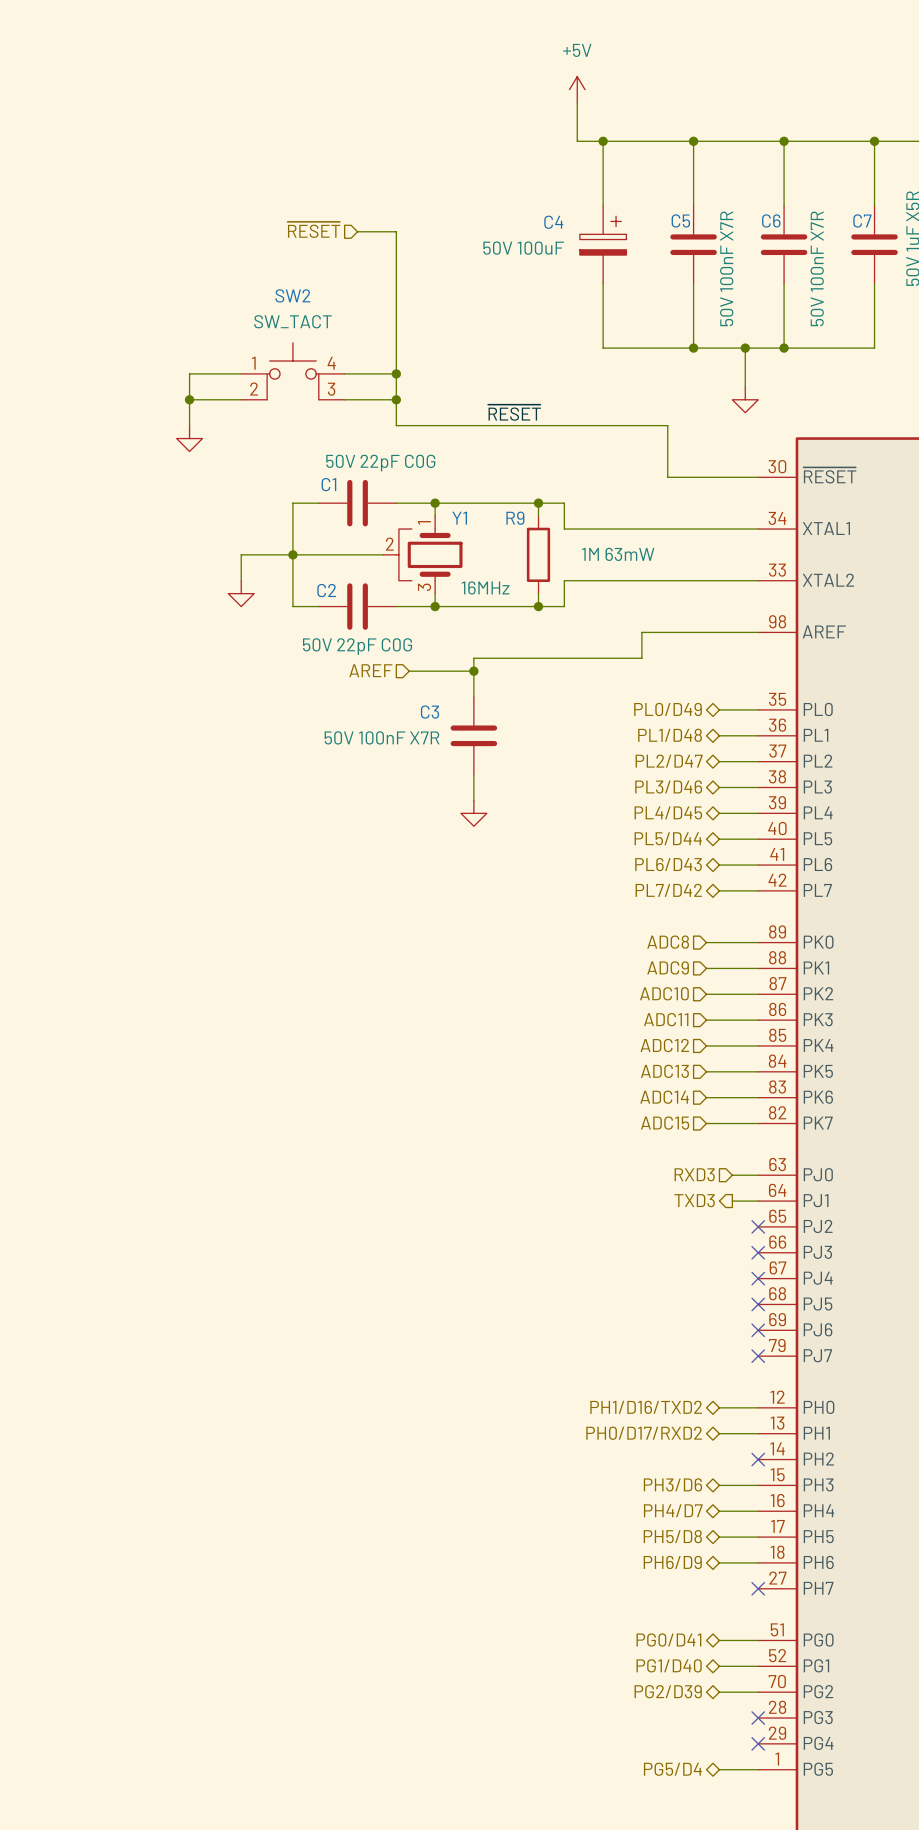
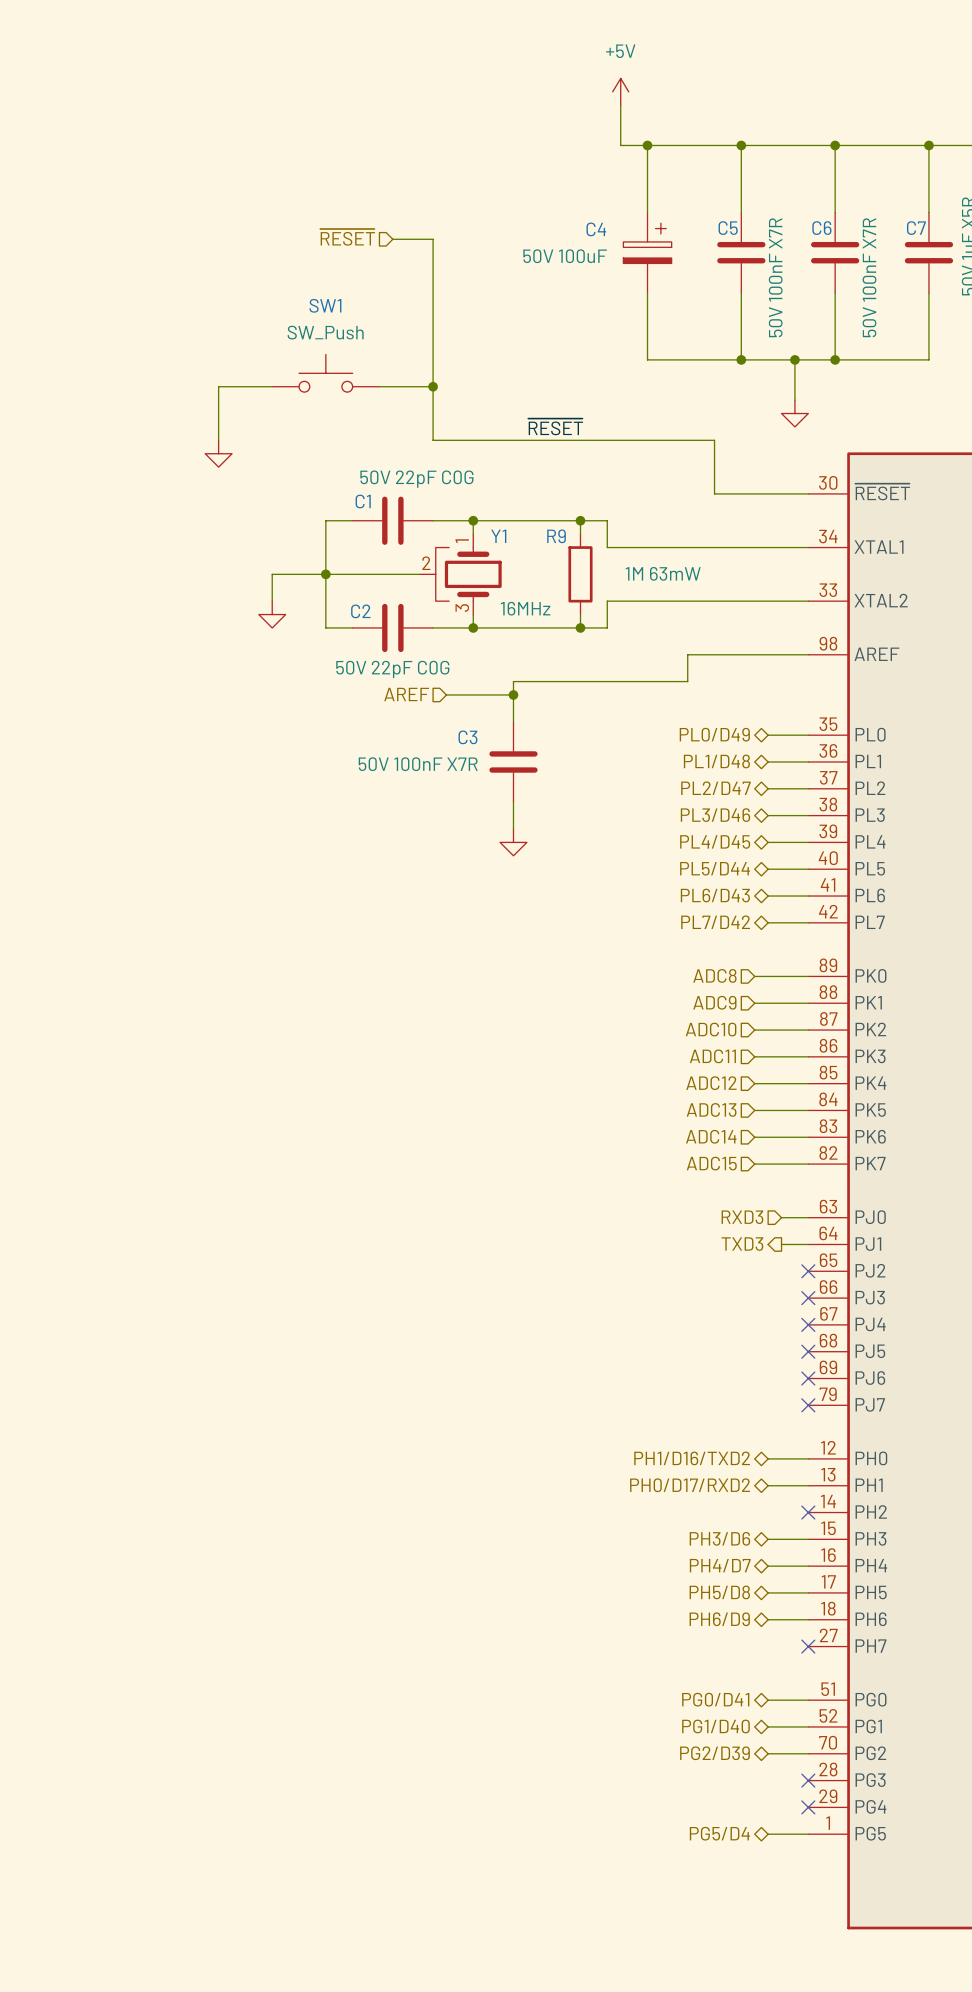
SW1: none -> SW_Push (325, 373)
SW2: SW_TACT (292, 371) -> none
wire: (189, 399) (241, 399) -> none
junction: (189, 399) -> none
wire: (344, 399) (396, 399) -> none
junction: (396, 399) -> none

